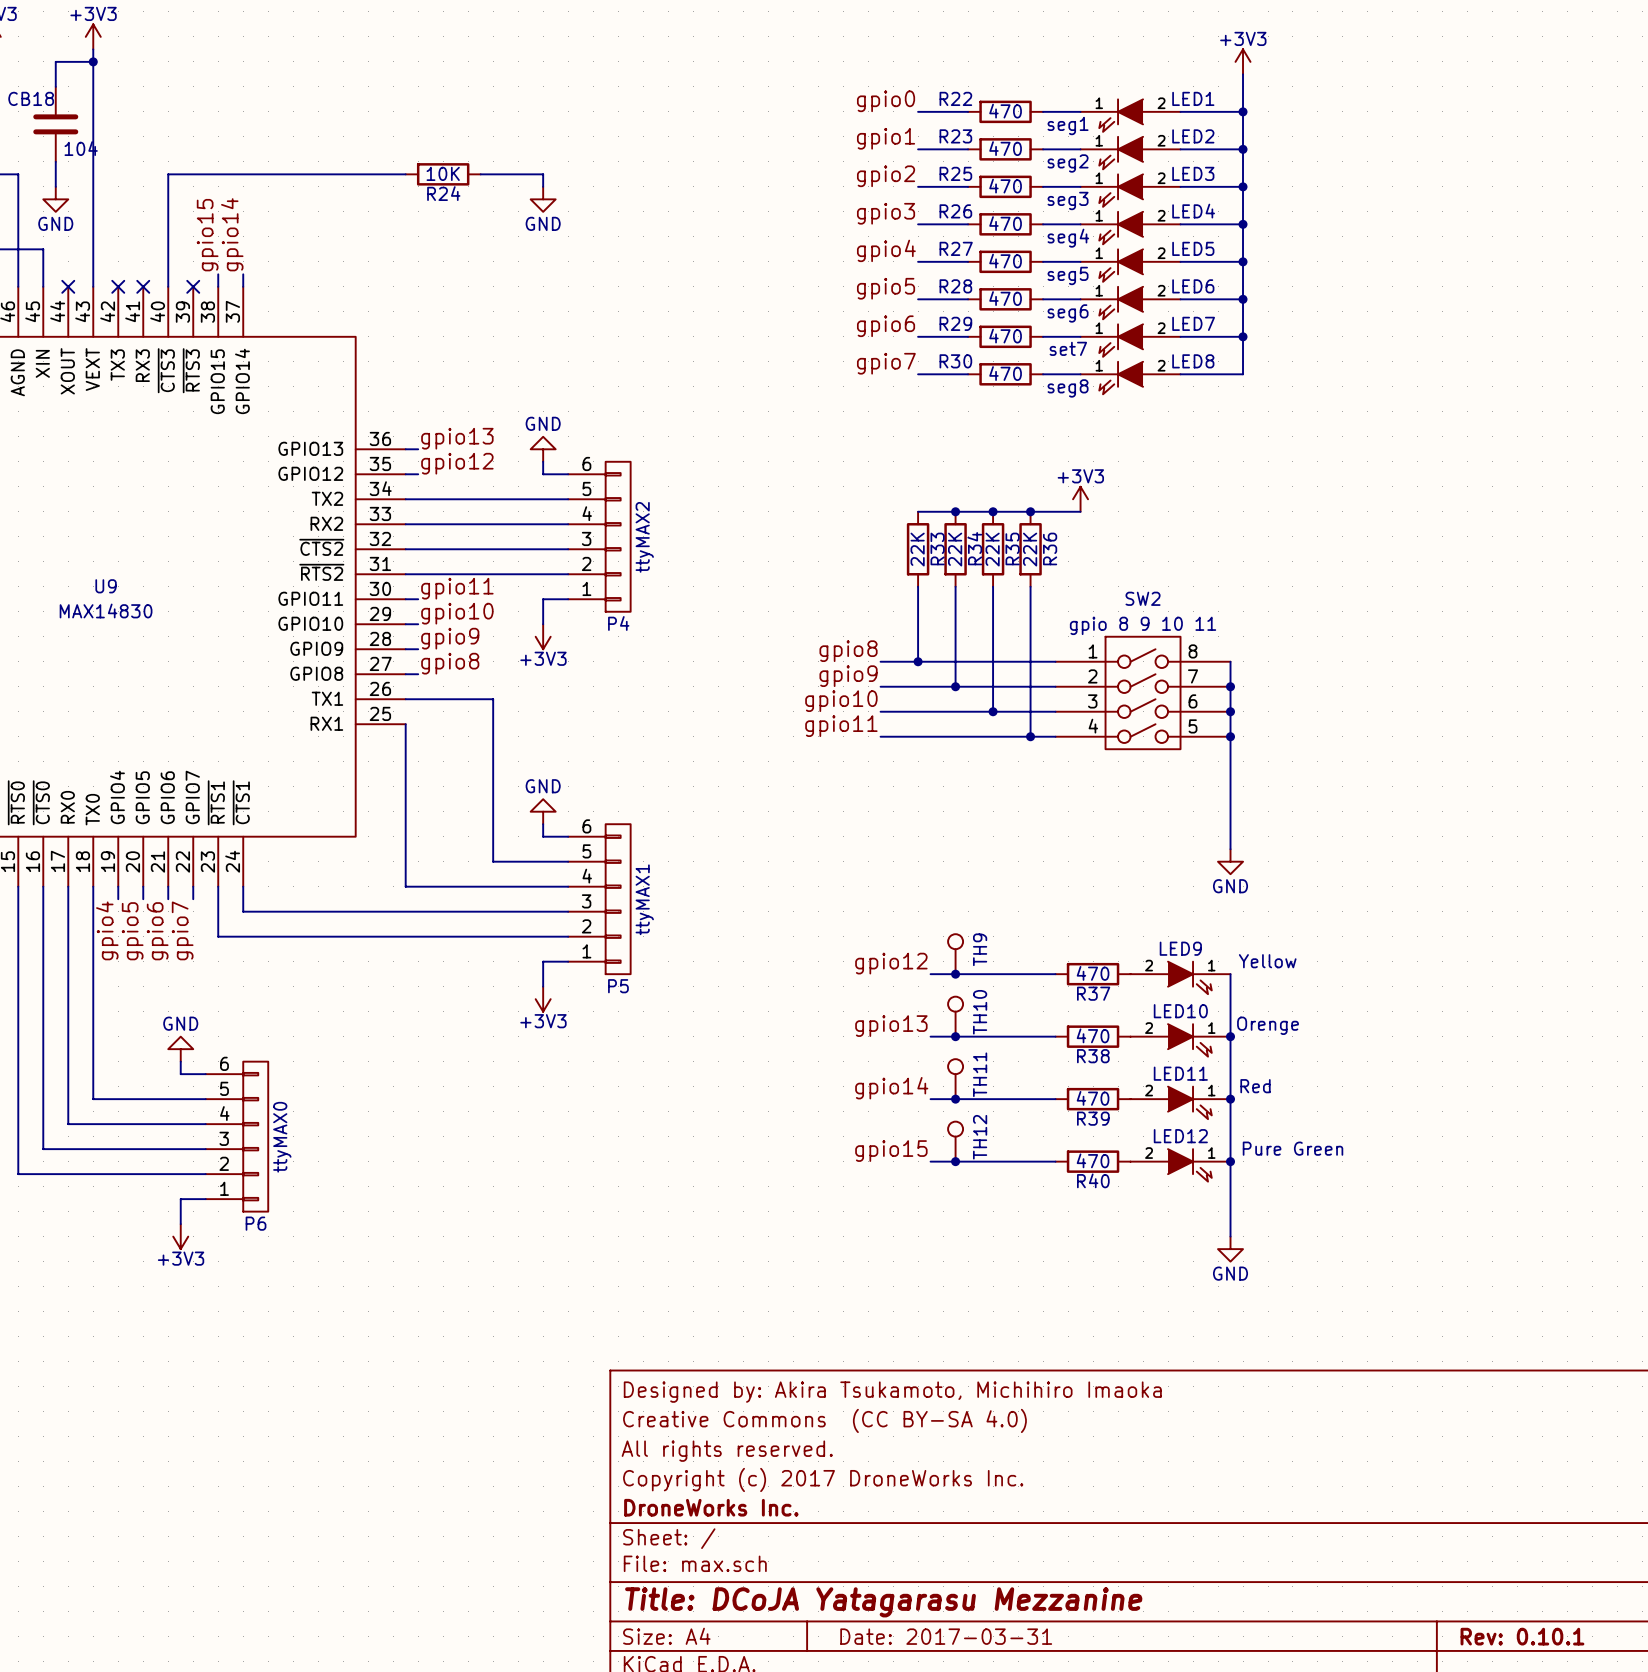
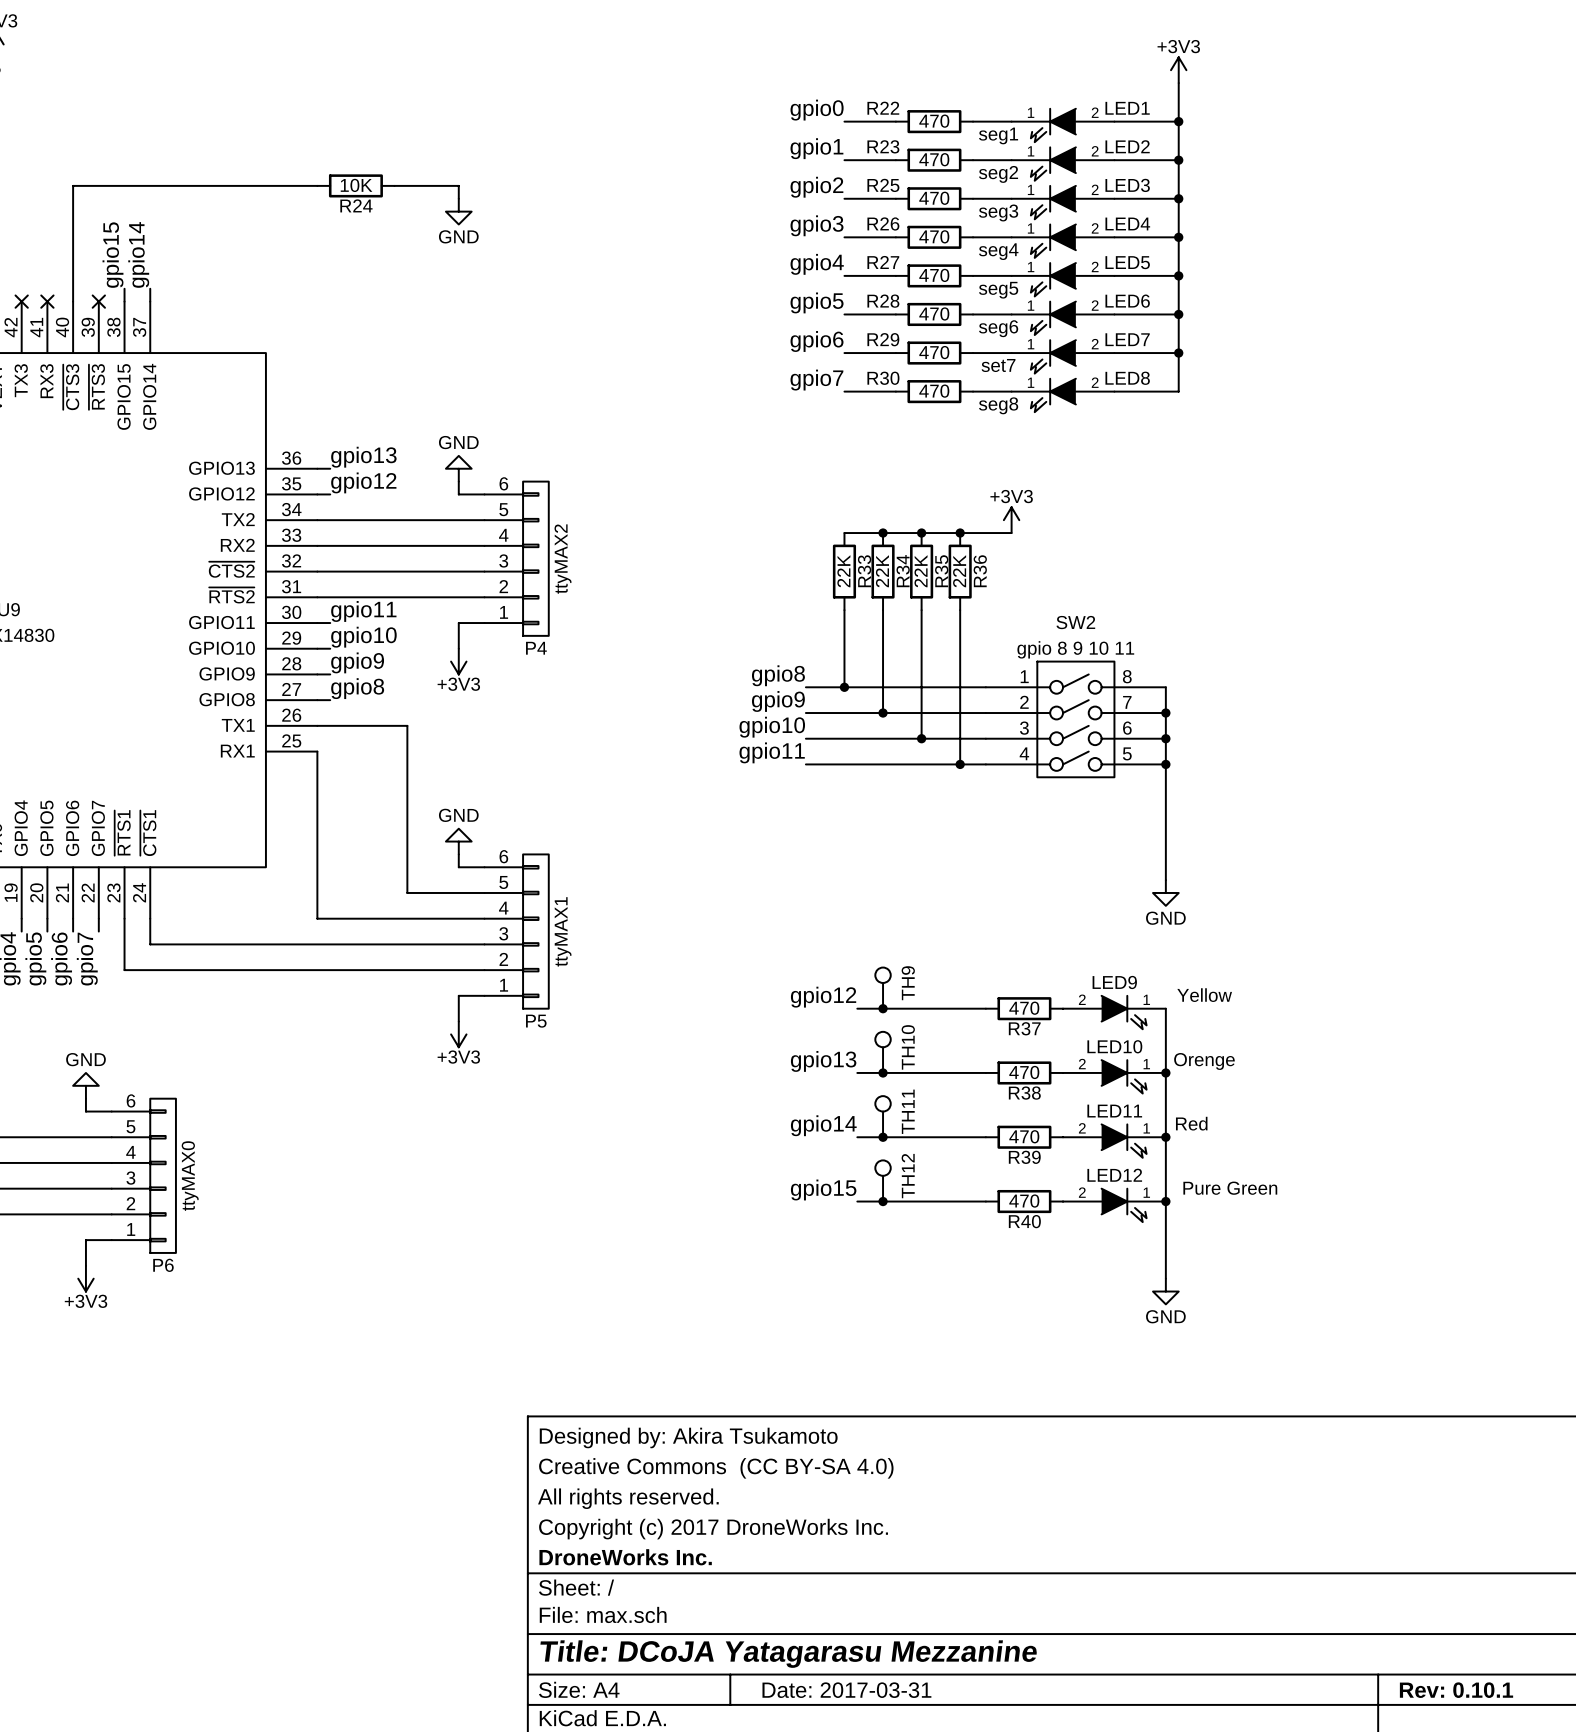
title block: Designed by: Akira Tsukamoto, Michihiro Imaoka (892, 1392) -> Designed by: Akira Tsukamoto (688, 1437)

